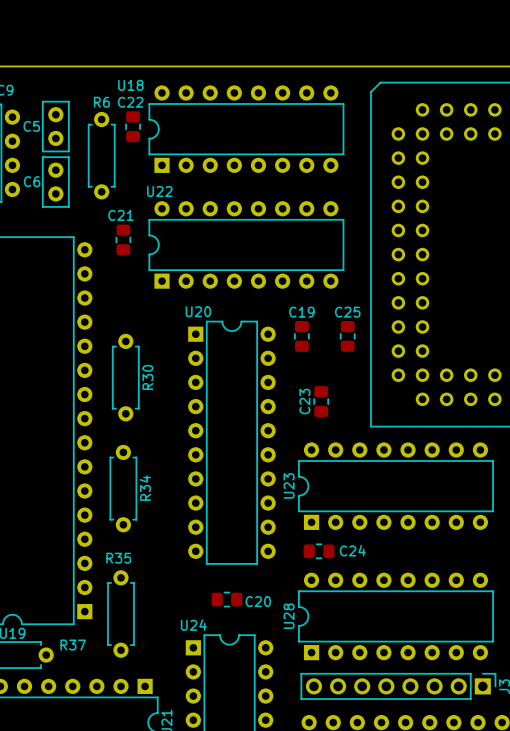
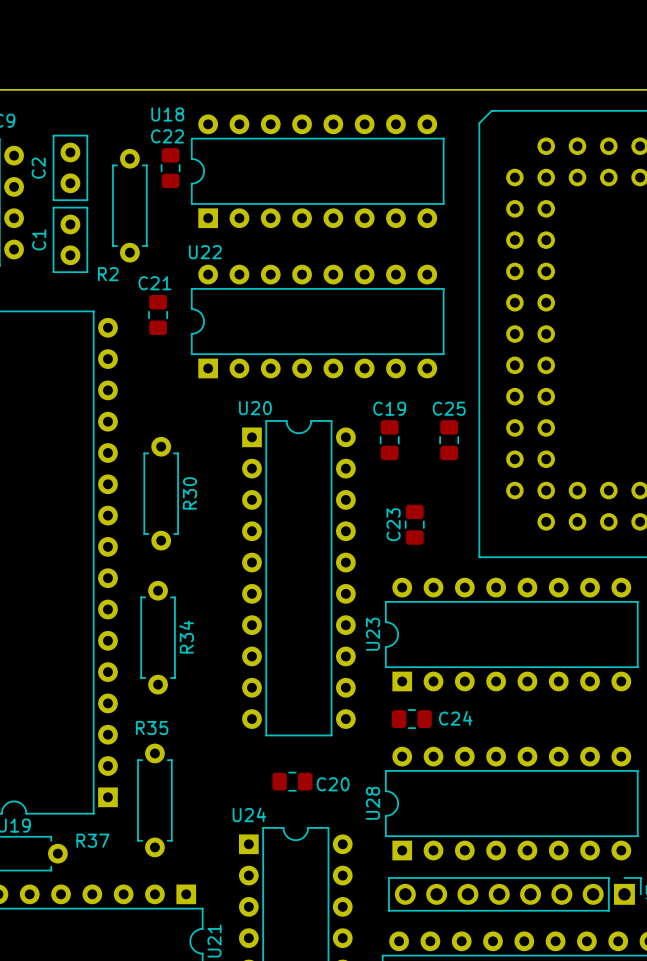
R6 name: R6 (101, 102) -> R2 (108, 274)
C5 name: C5 (31, 126) -> C2 (38, 168)
C6 name: C6 (32, 181) -> C1 (39, 239)

